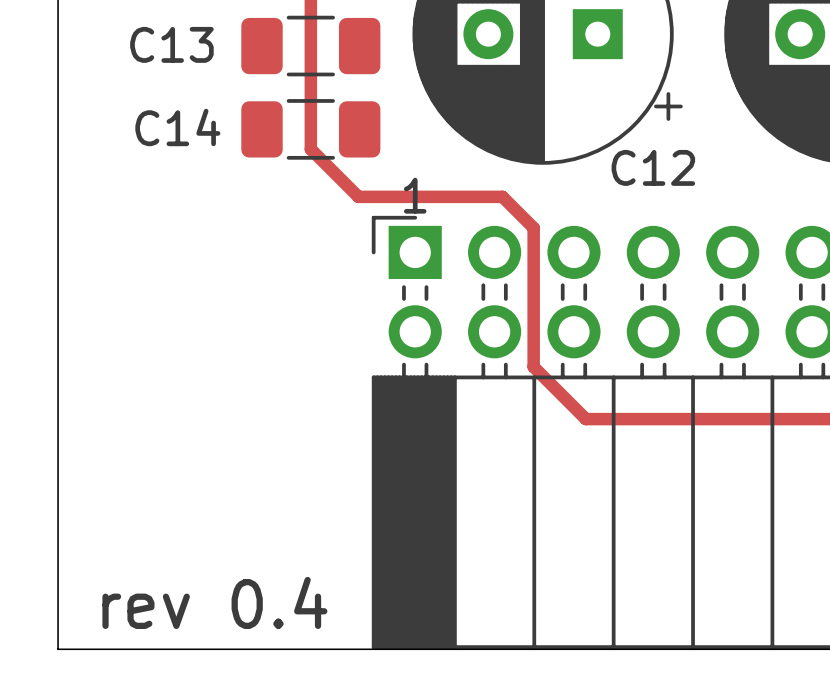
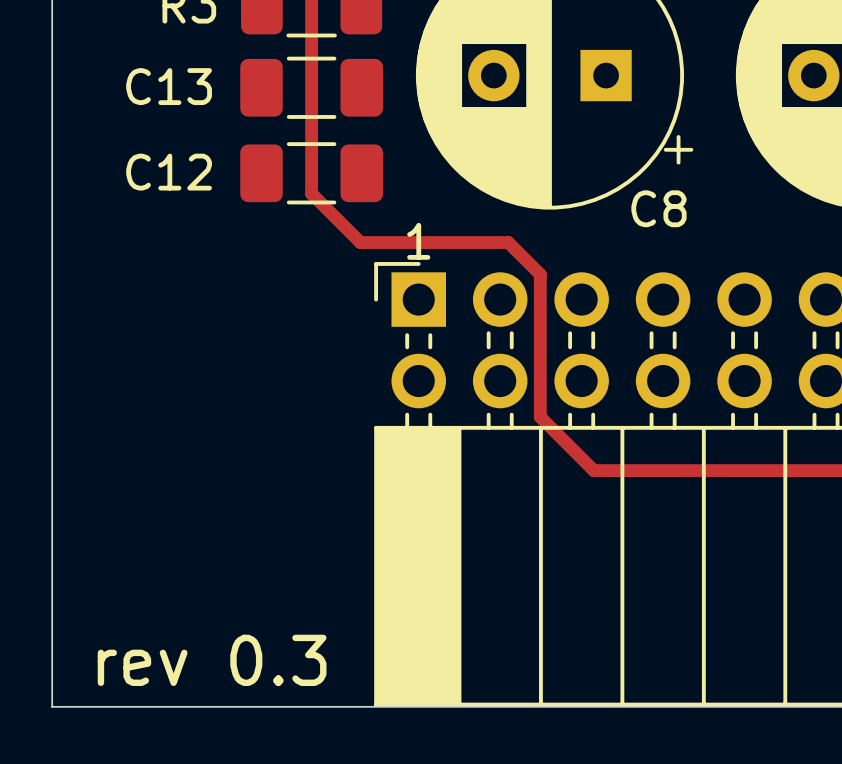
C14 name: C14 (177, 127) -> C12 (169, 172)
C12 name: C12 (653, 167) -> C8 (658, 208)
text: rev 0.4 (214, 602) -> rev 0.3 (212, 660)

